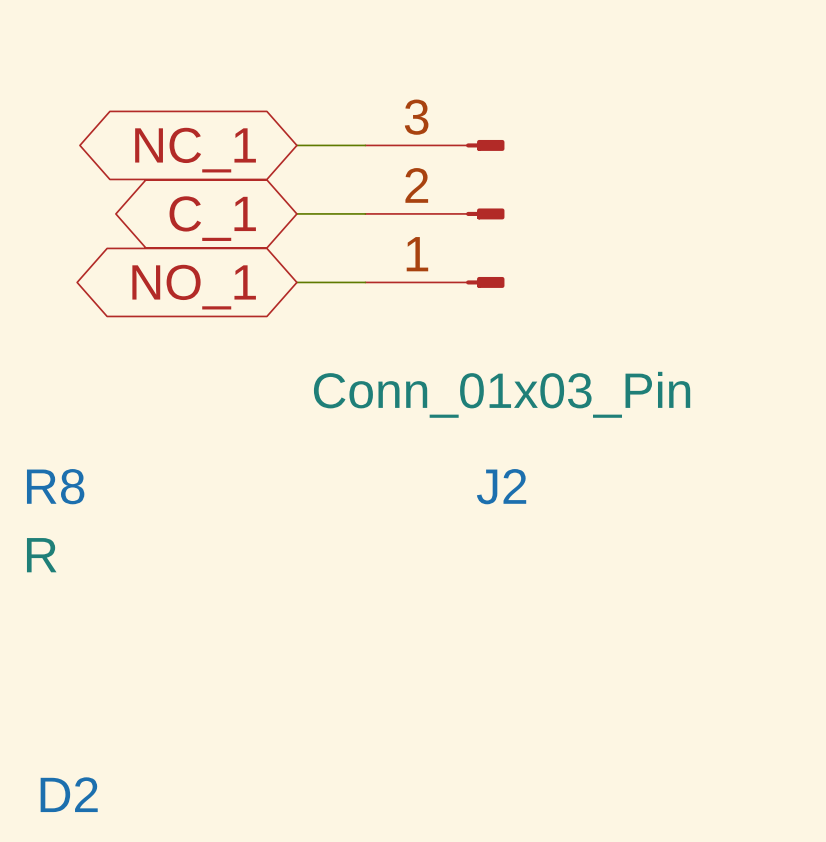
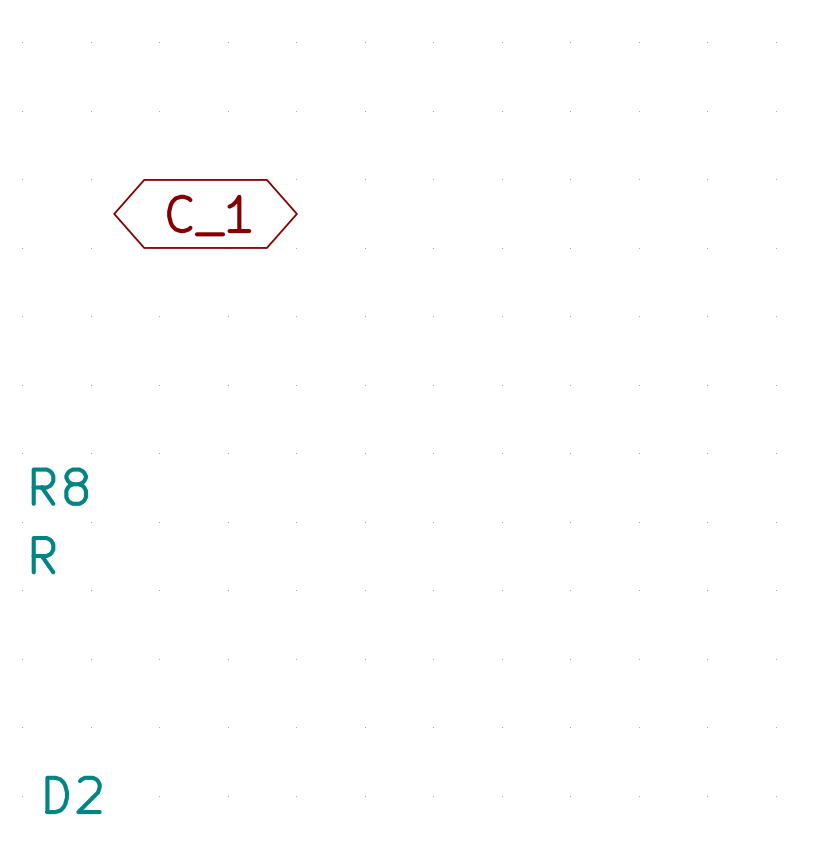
wire: (296, 145) (365, 145) -> none
global label: NC_1 (195, 150) -> none
wire: (296, 213) (365, 213) -> none
J2: Conn_01x03_Pin (434, 213) -> none
wire: (296, 282) (365, 282) -> none
global label: NO_1 (194, 287) -> none

